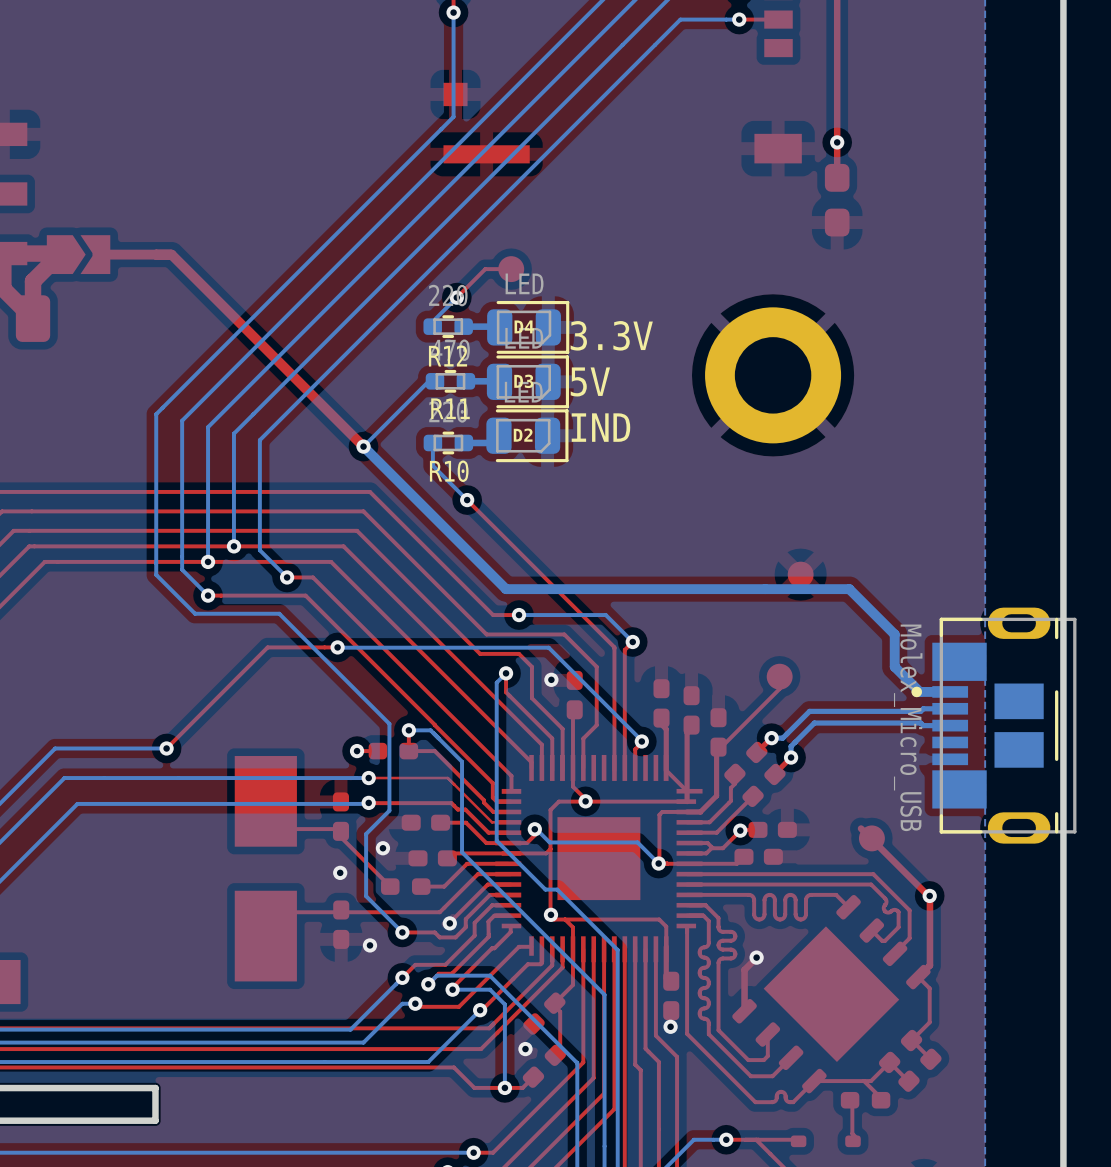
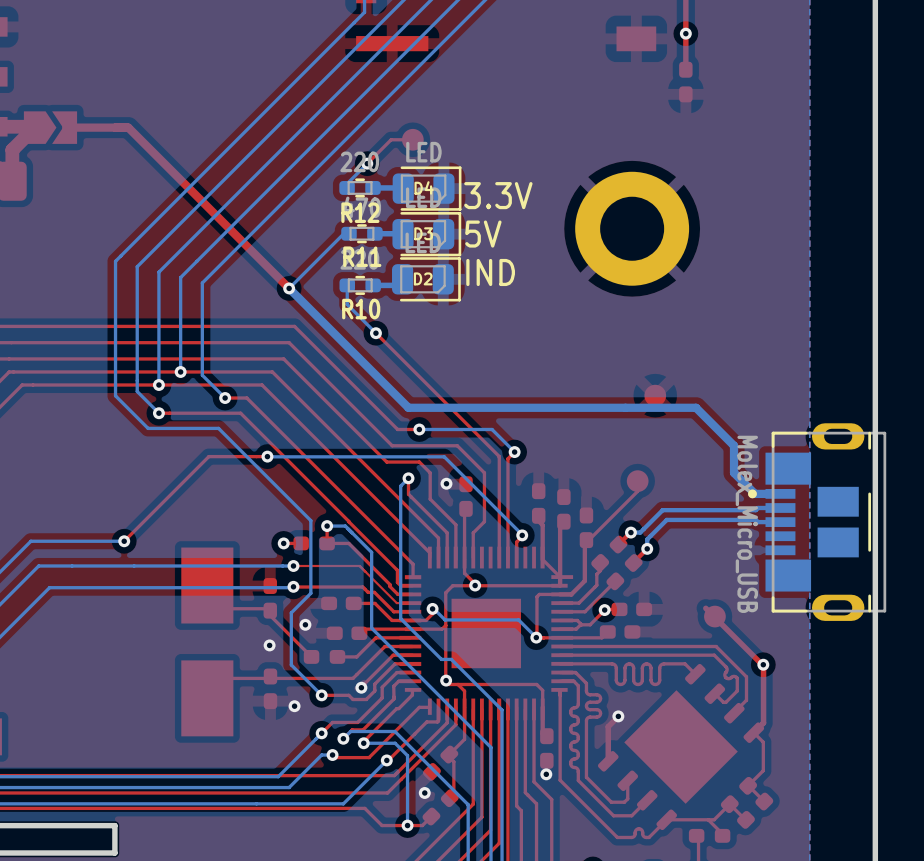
part footprint: [824, 163, 850, 237] -> [679, 61, 693, 103]

